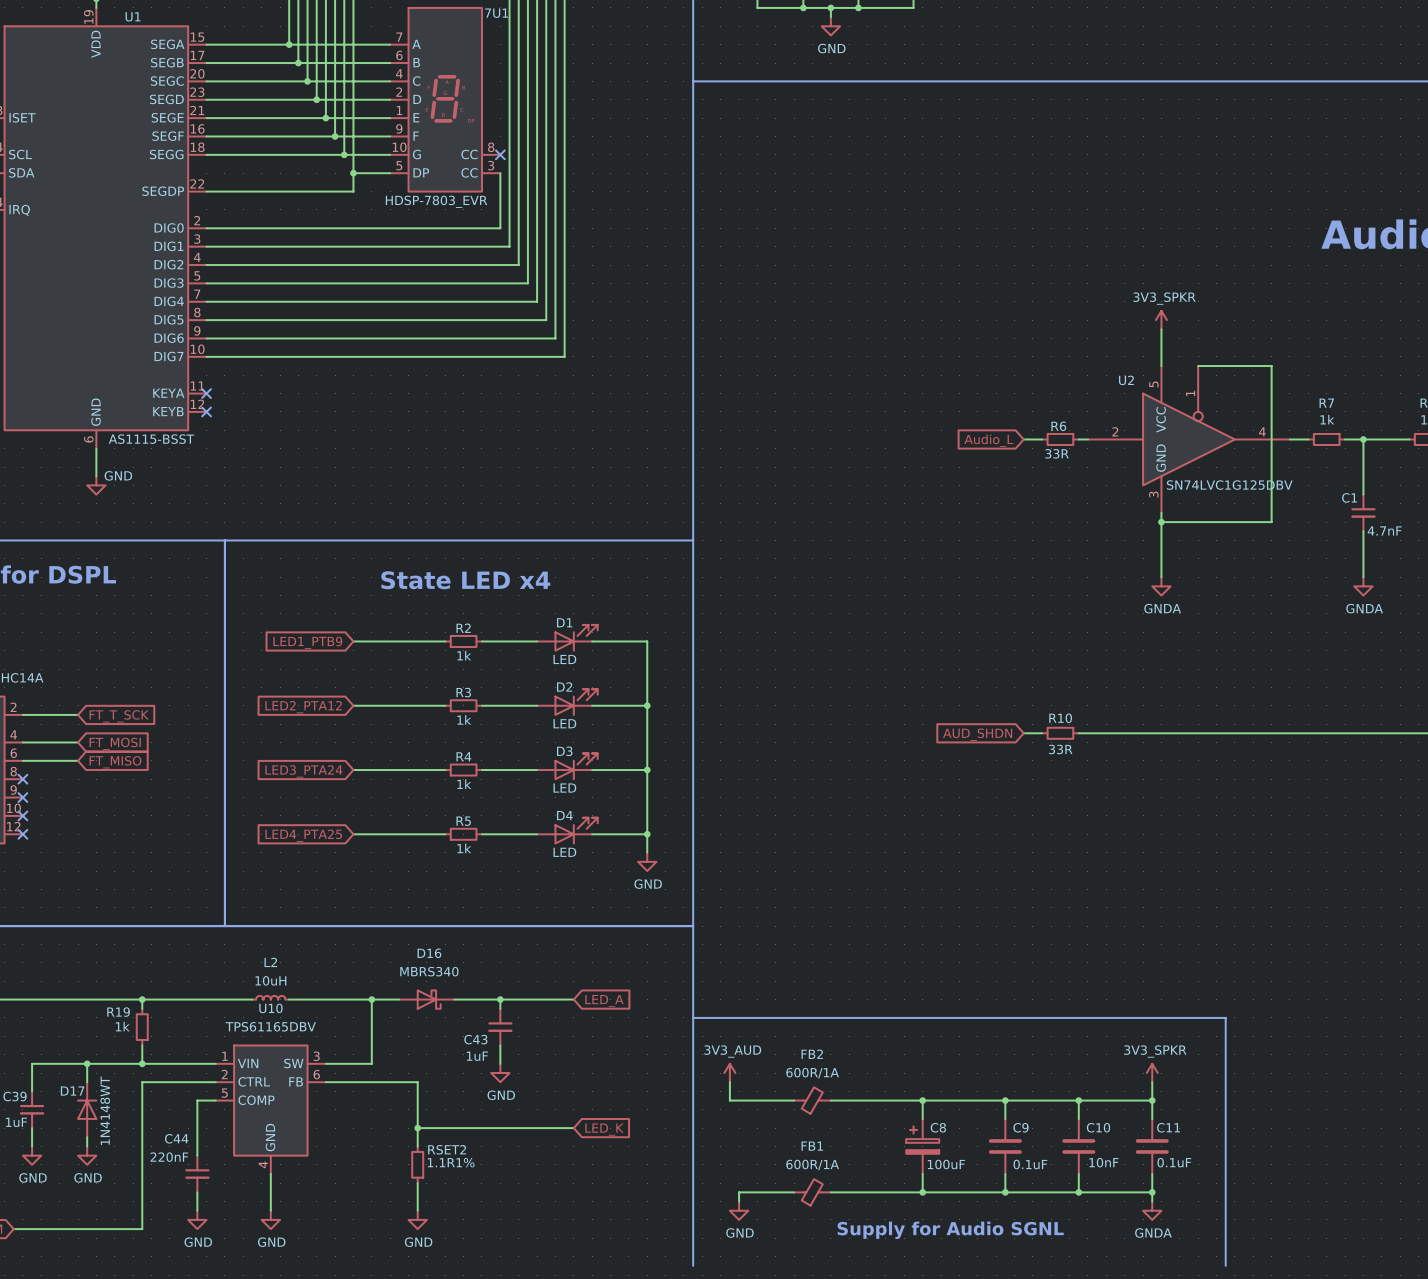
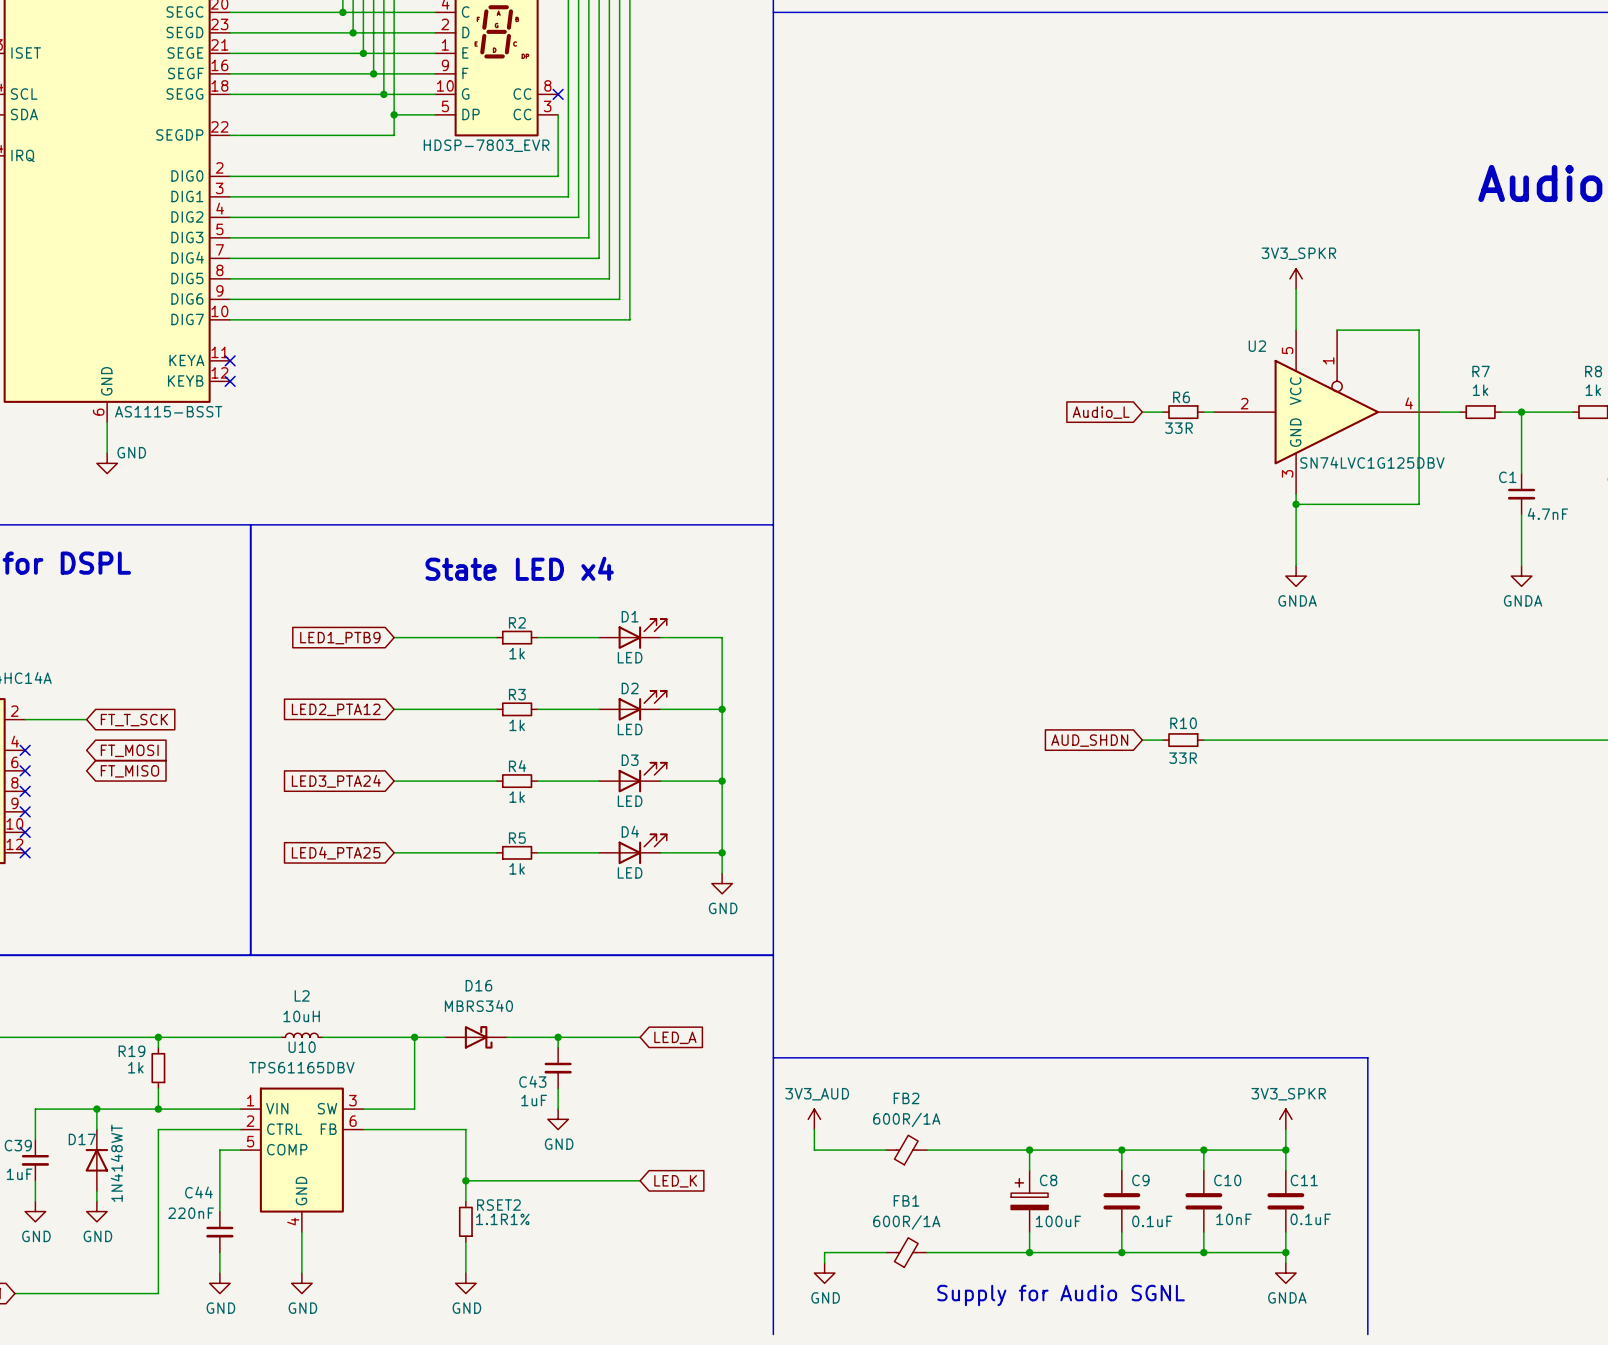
wire: (22, 742) (78, 742) -> none
no-connect mark: none -> (25, 750)
wire: (22, 760) (78, 760) -> none
no-connect mark: none -> (25, 770)

